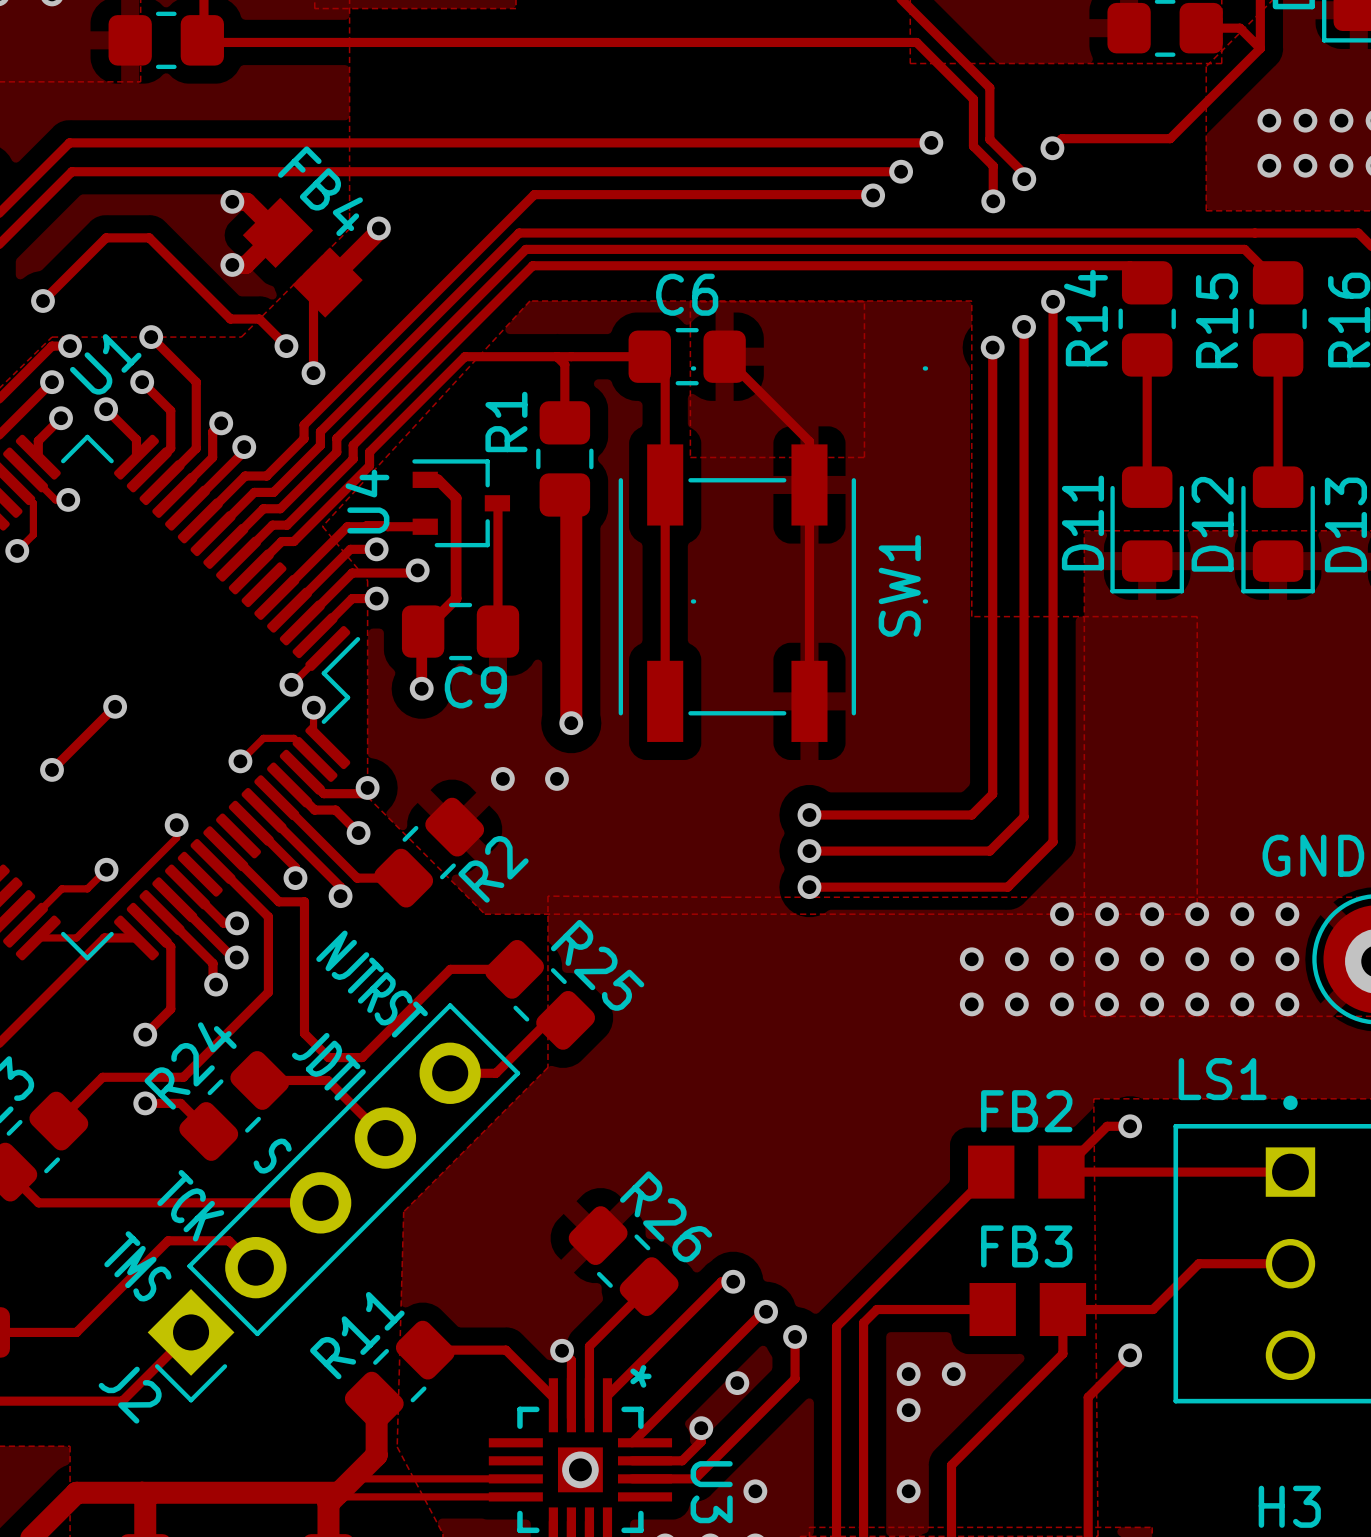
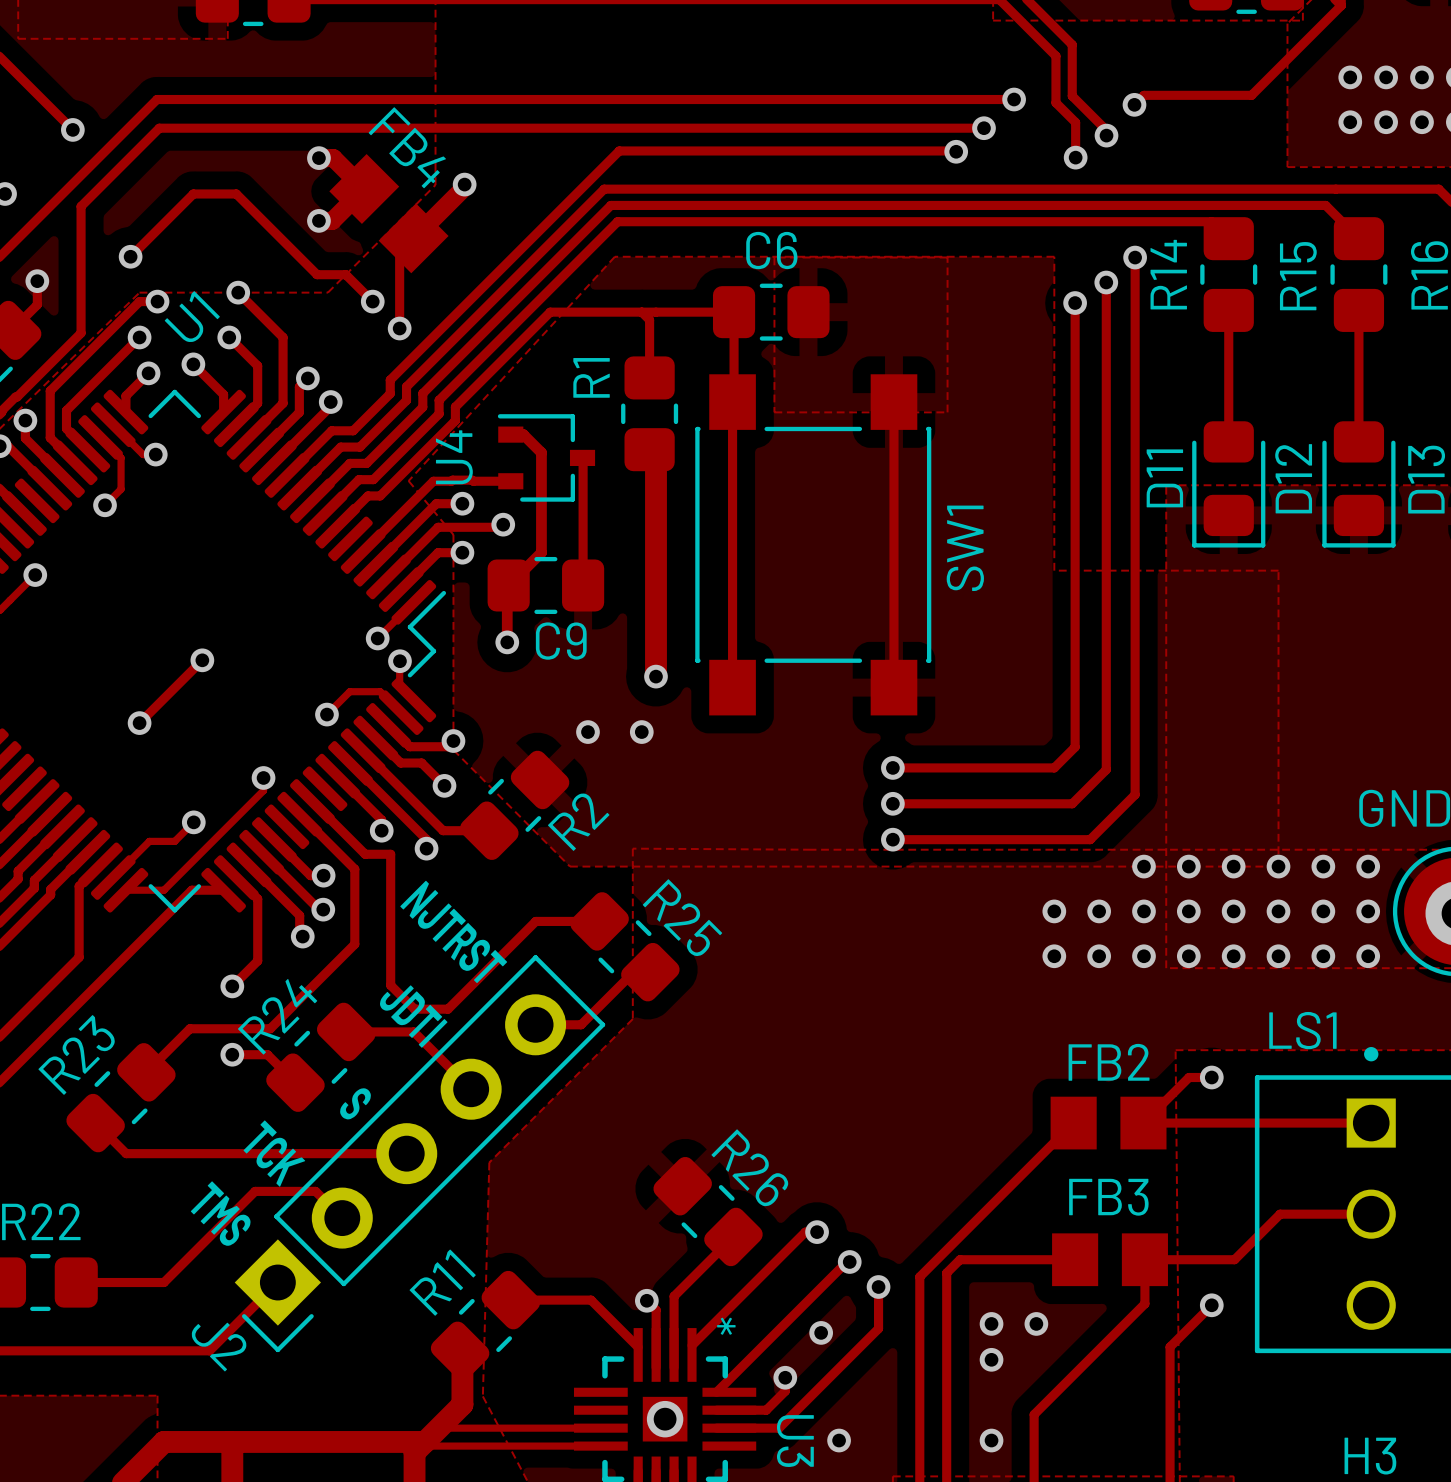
track: (649, 356) (665, 372) (665, 701) -> (734, 312) (732, 687)
track: (724, 356) (809, 441) (809, 701) -> none
SW1 footprint: [618, 366, 929, 742] -> [695, 374, 932, 716]
track: none -> (893, 402) (893, 687)

